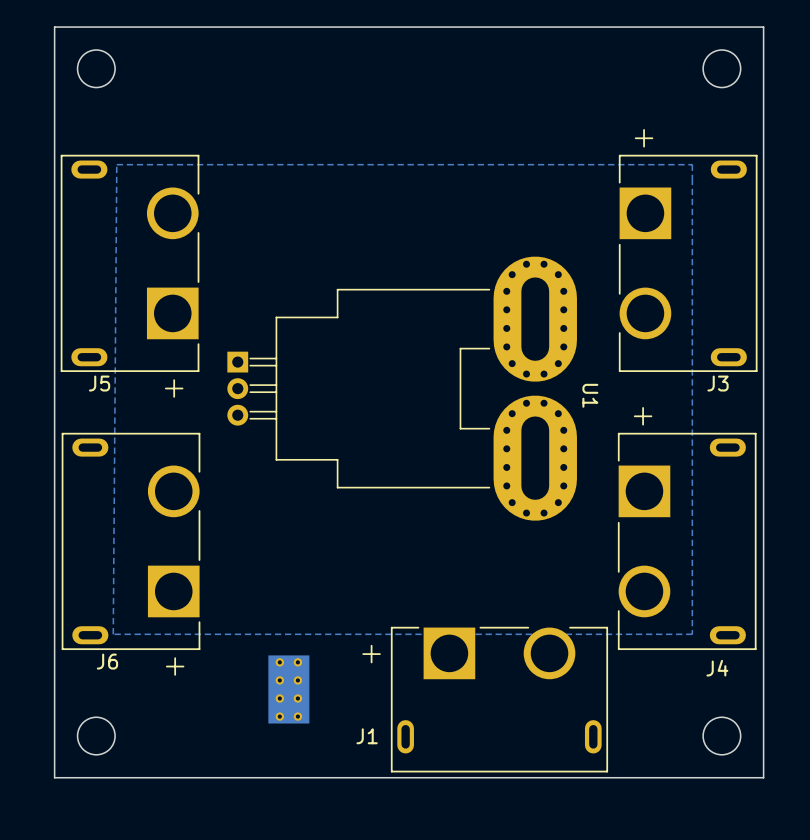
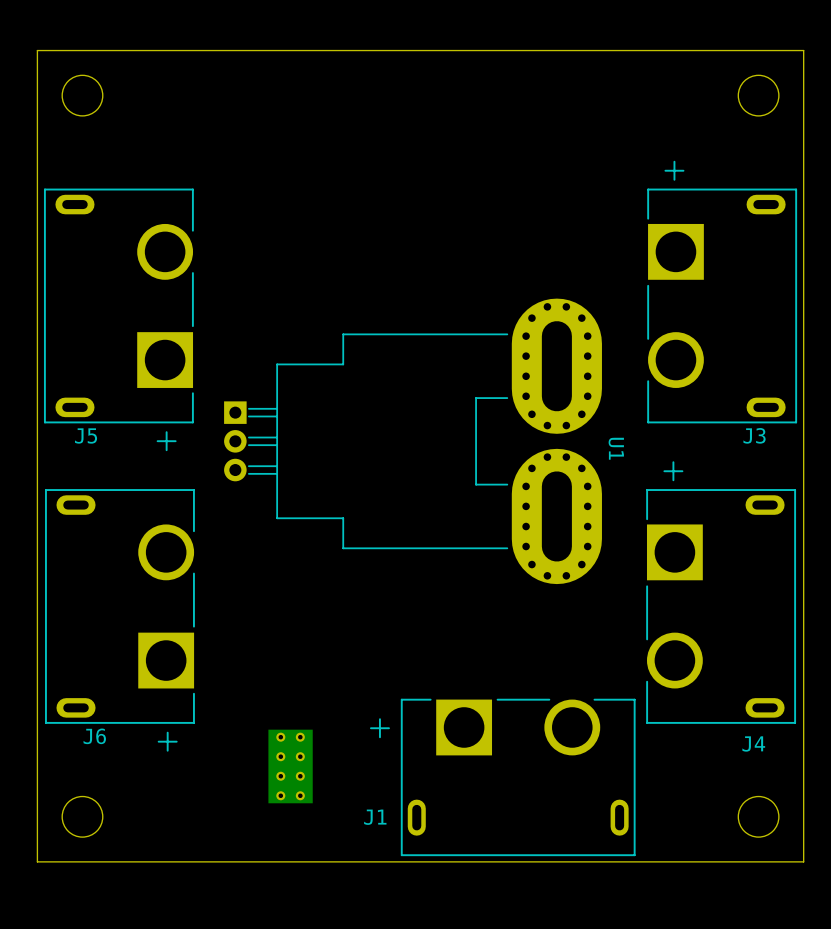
zone outline: (692, 164) (116, 164) (113, 634) (692, 634) (692, 164) -> none

